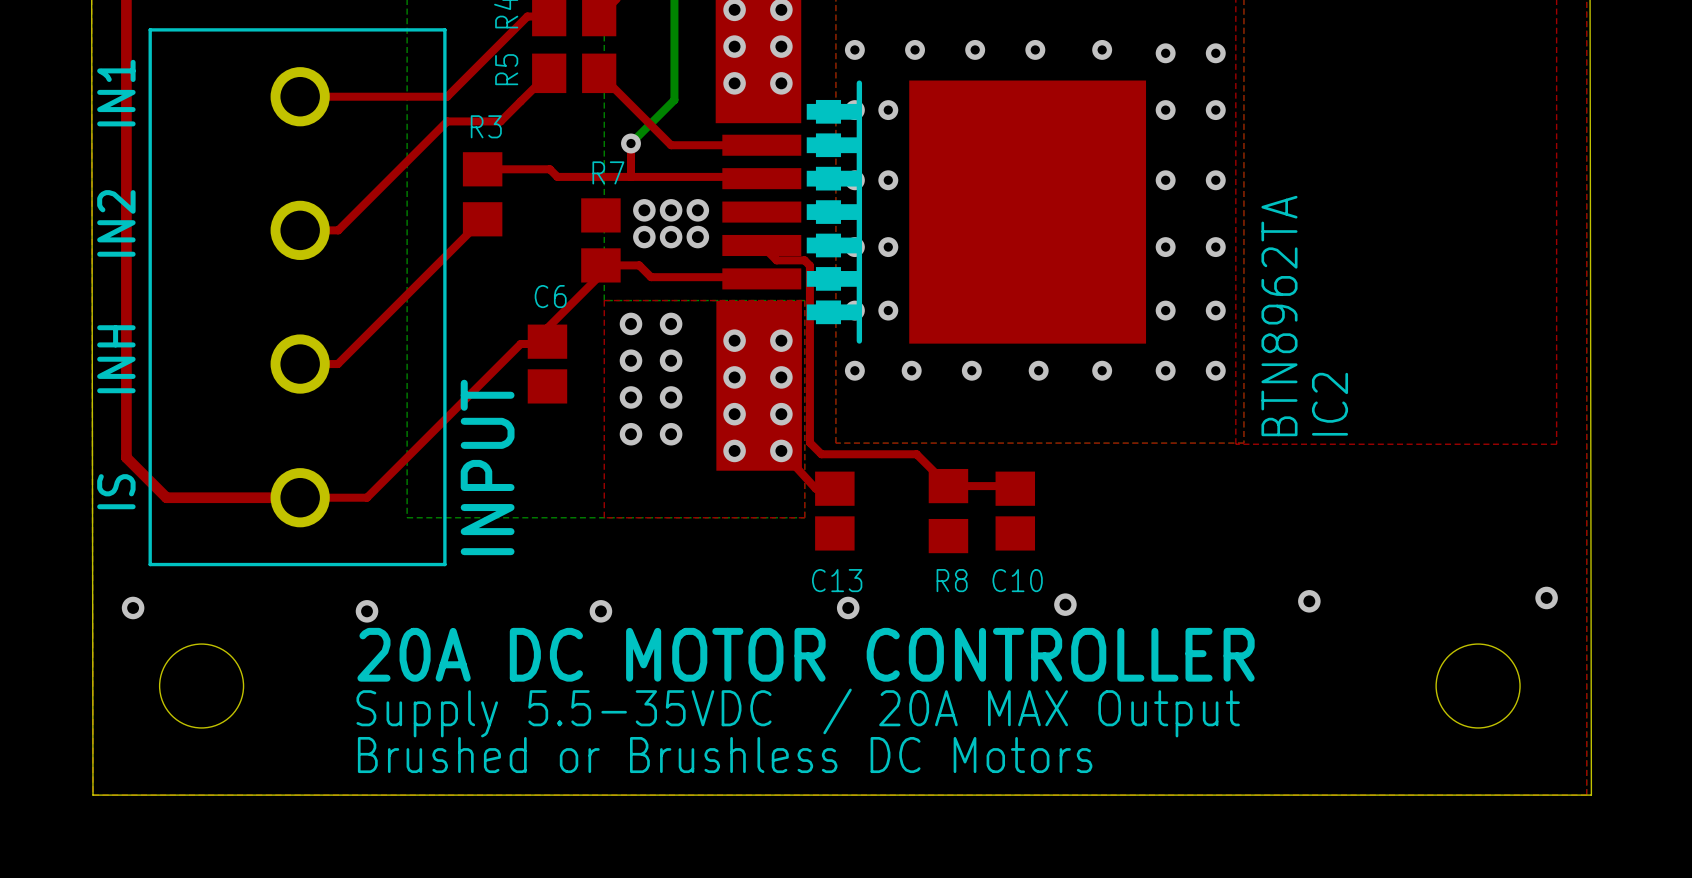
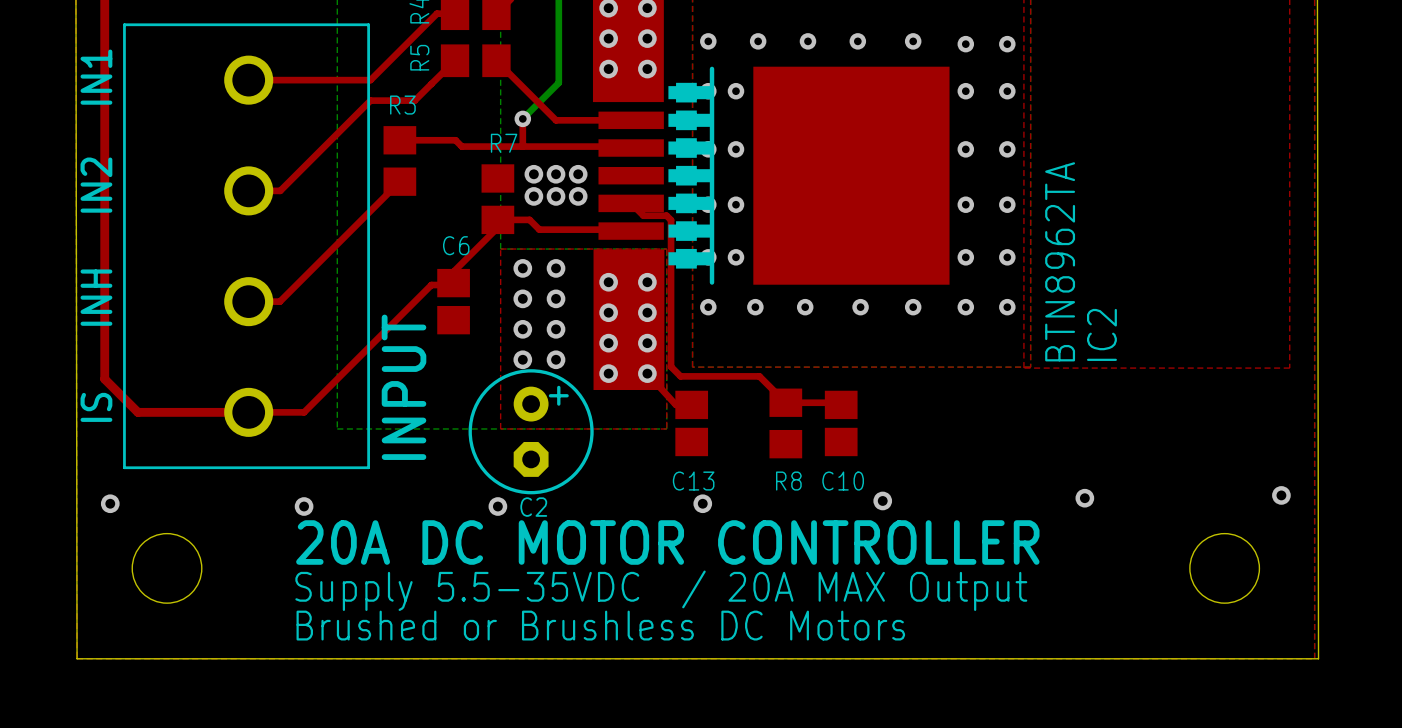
C2: none -> (531, 431)

